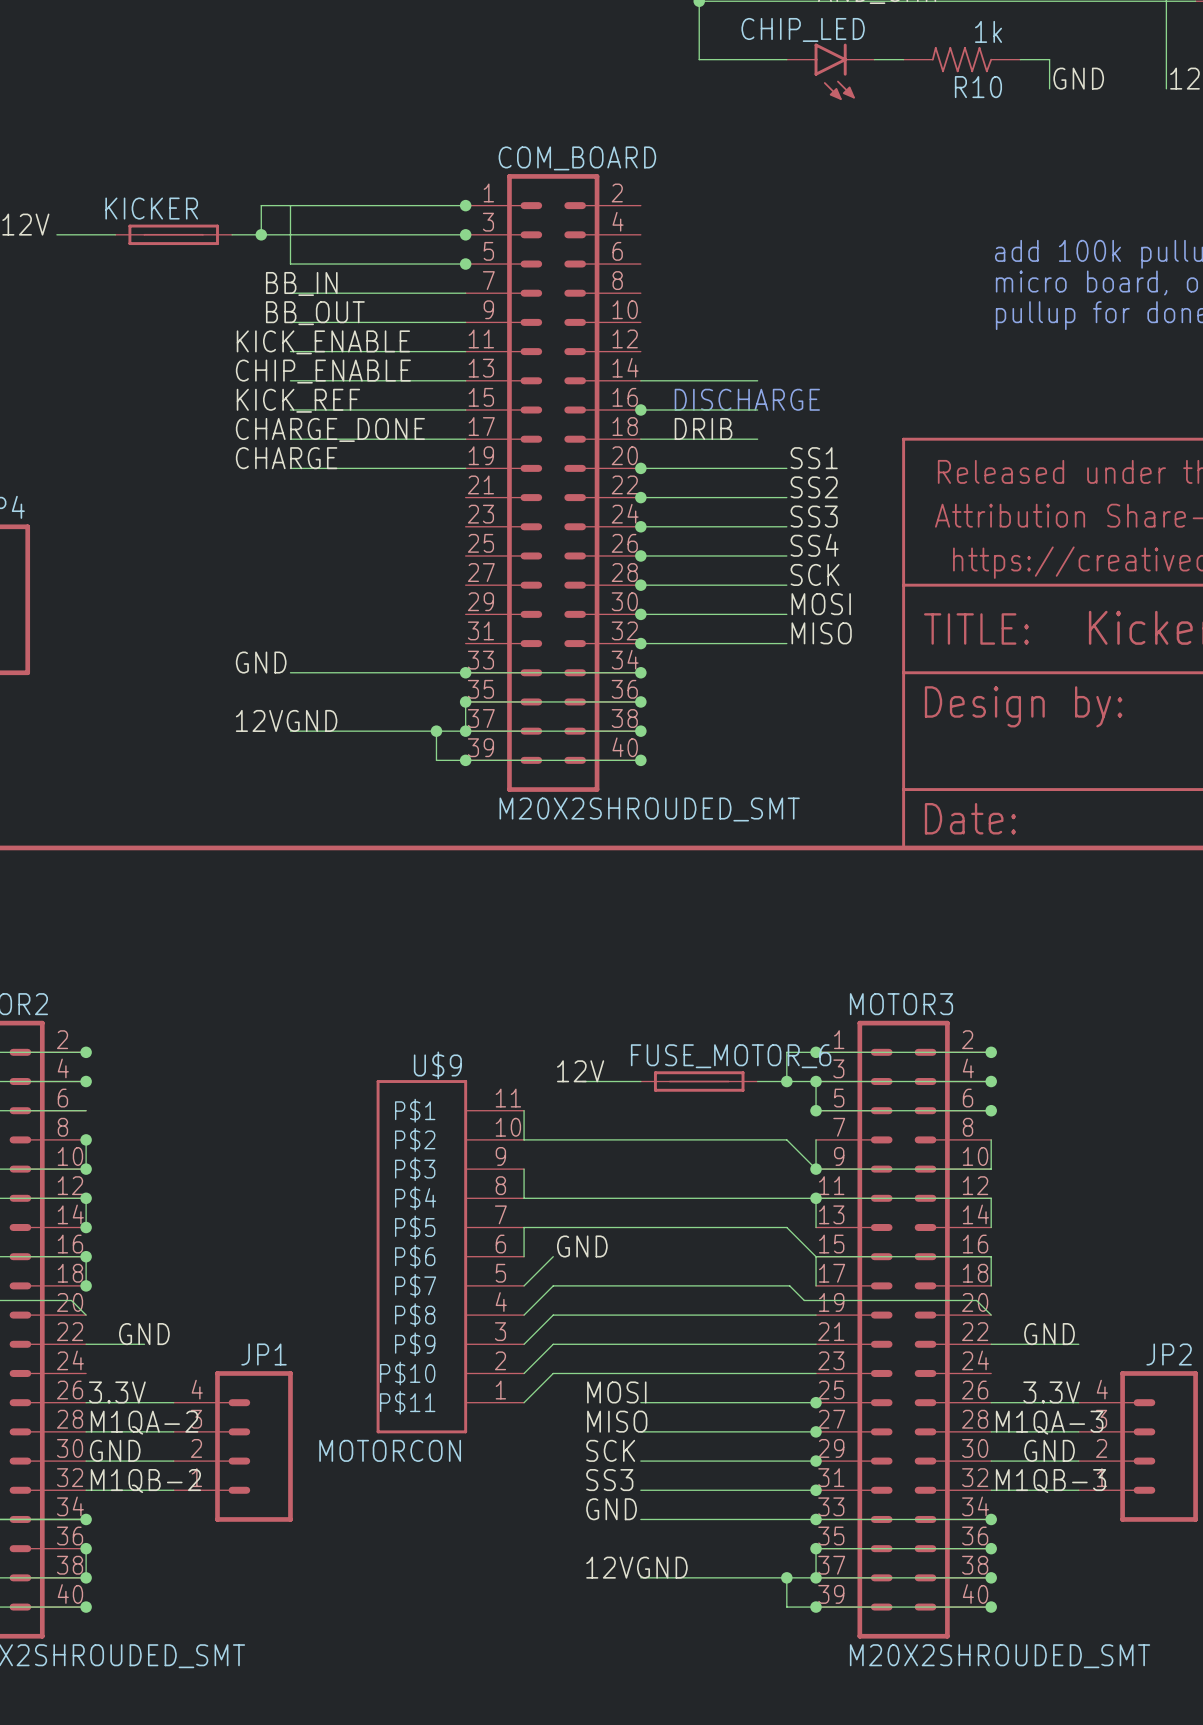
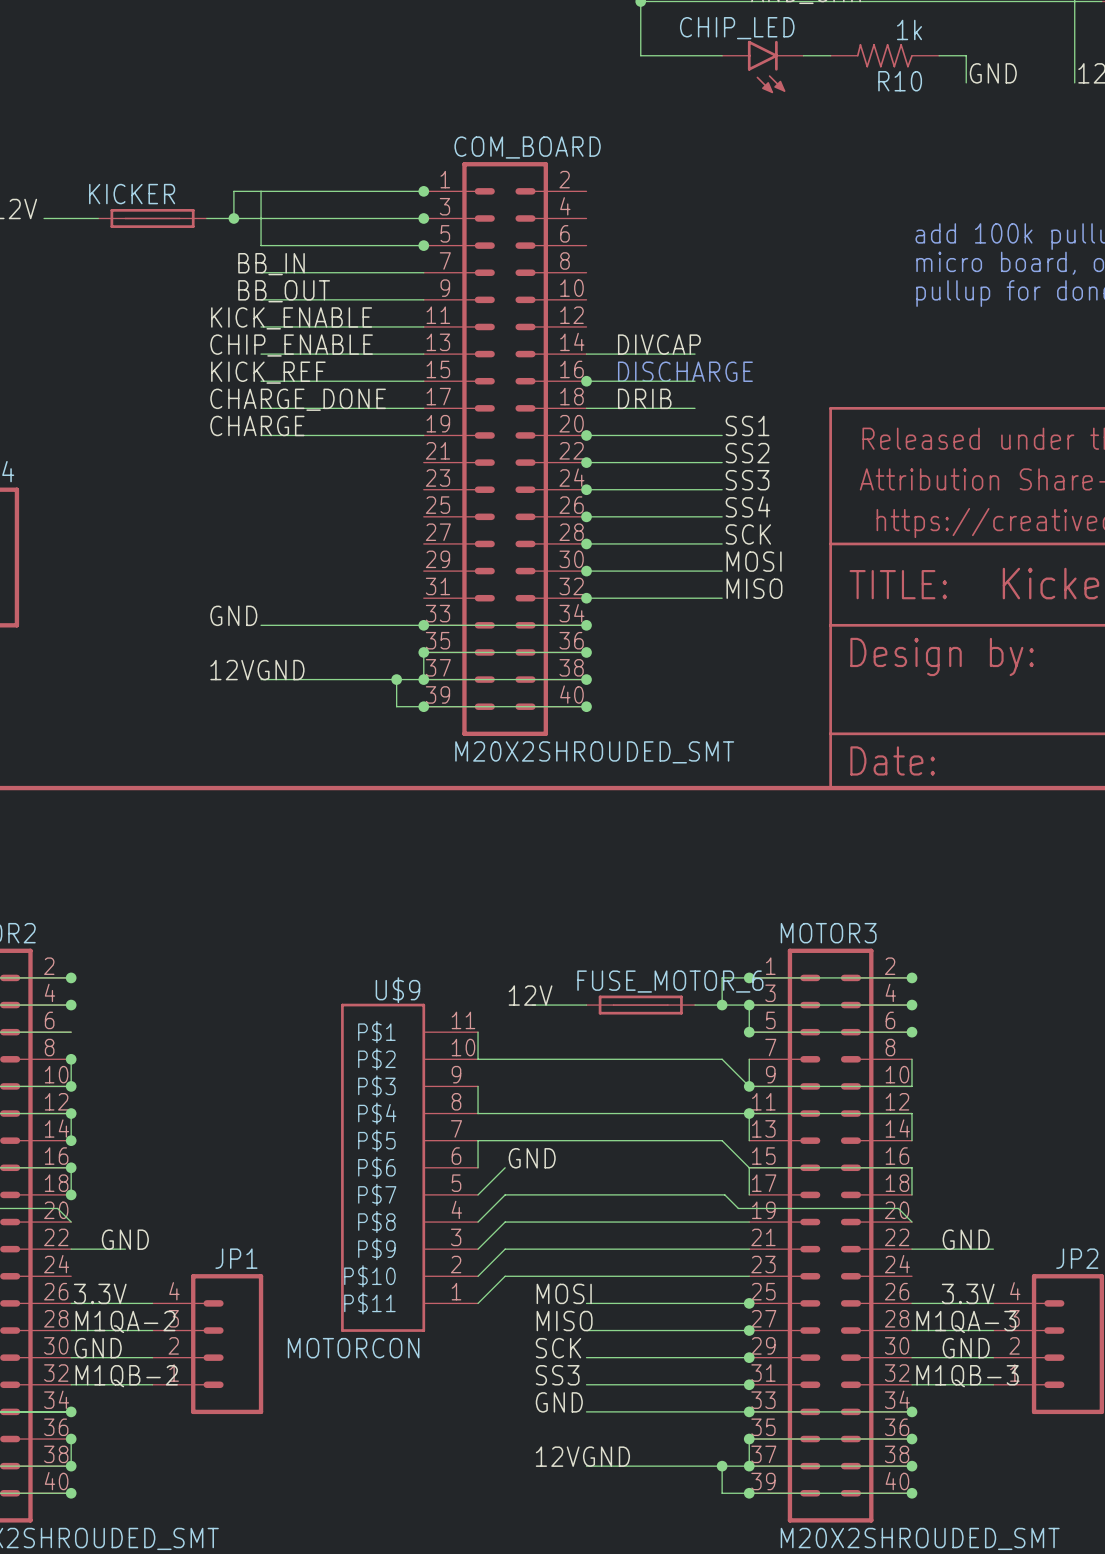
label: none -> DIVCAP (659, 344)

